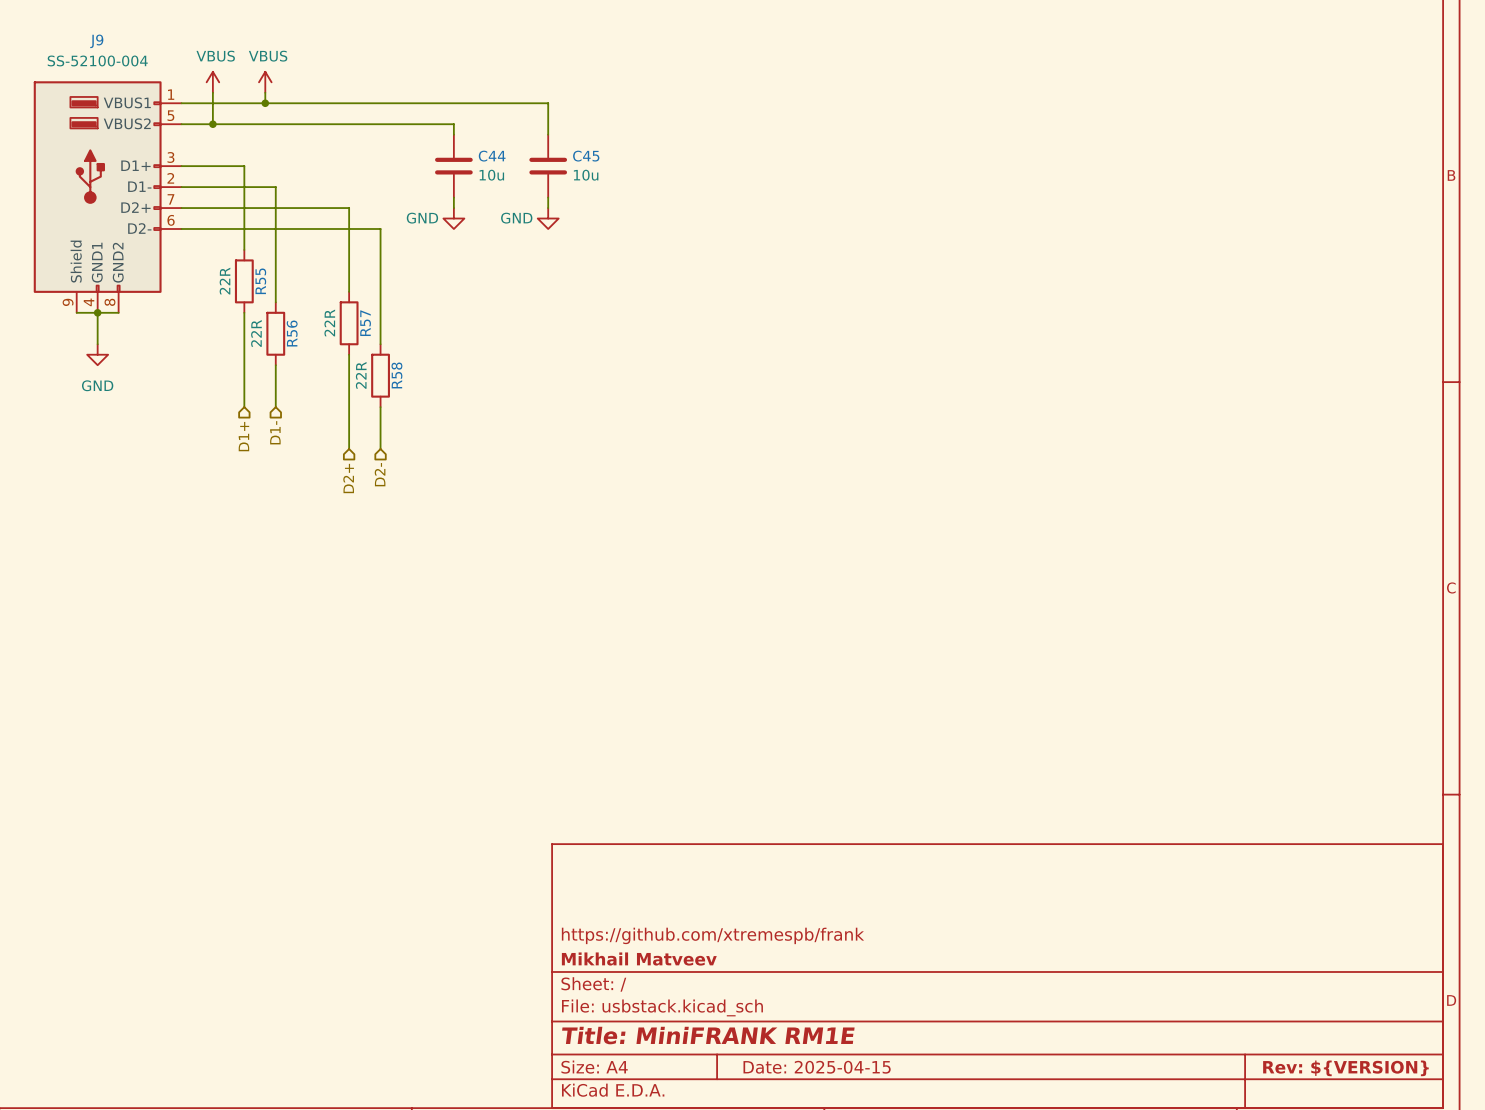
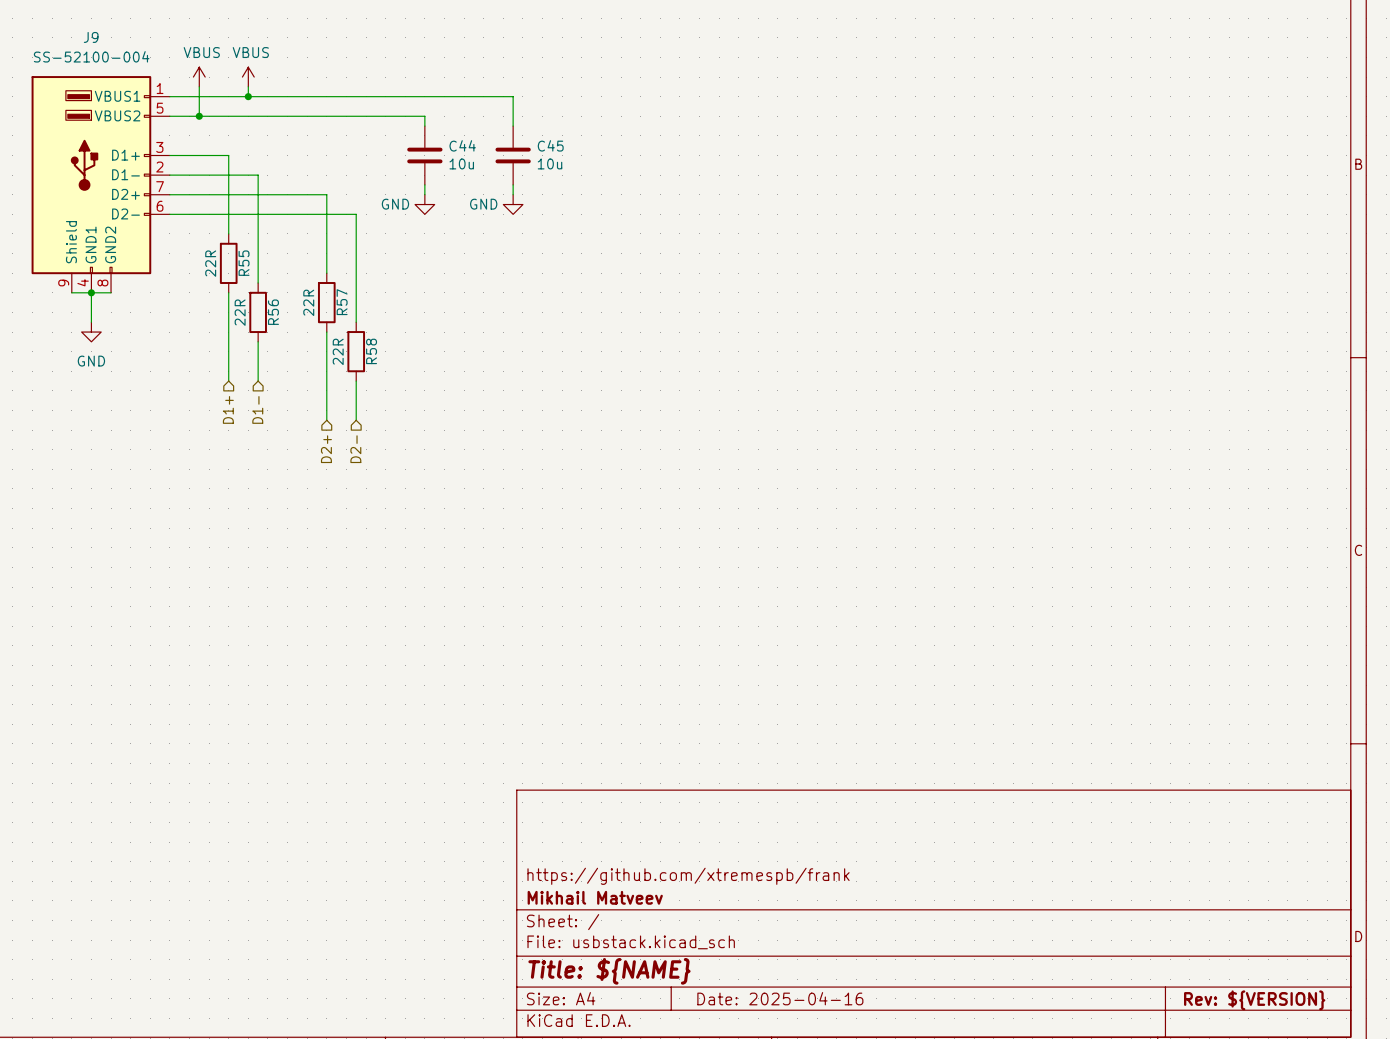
title block: Title: MiniFRANK RM1E (708, 1035) -> Title: ${NAME} (609, 971)
title block: Date: 2025-04-15 (817, 1067) -> Date: 2025-04-16 (780, 998)

